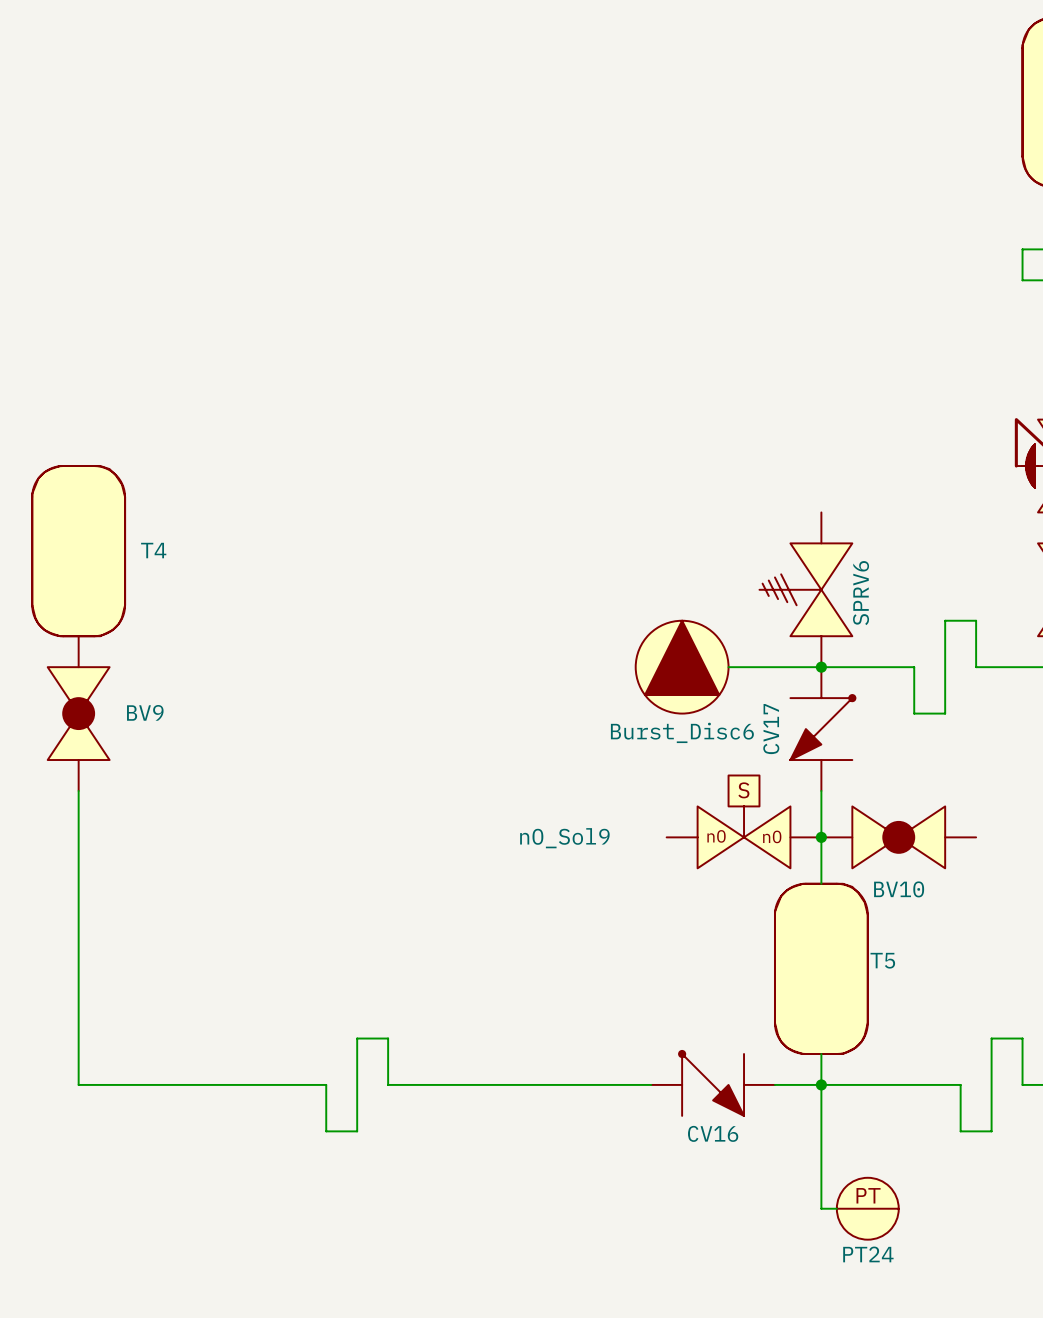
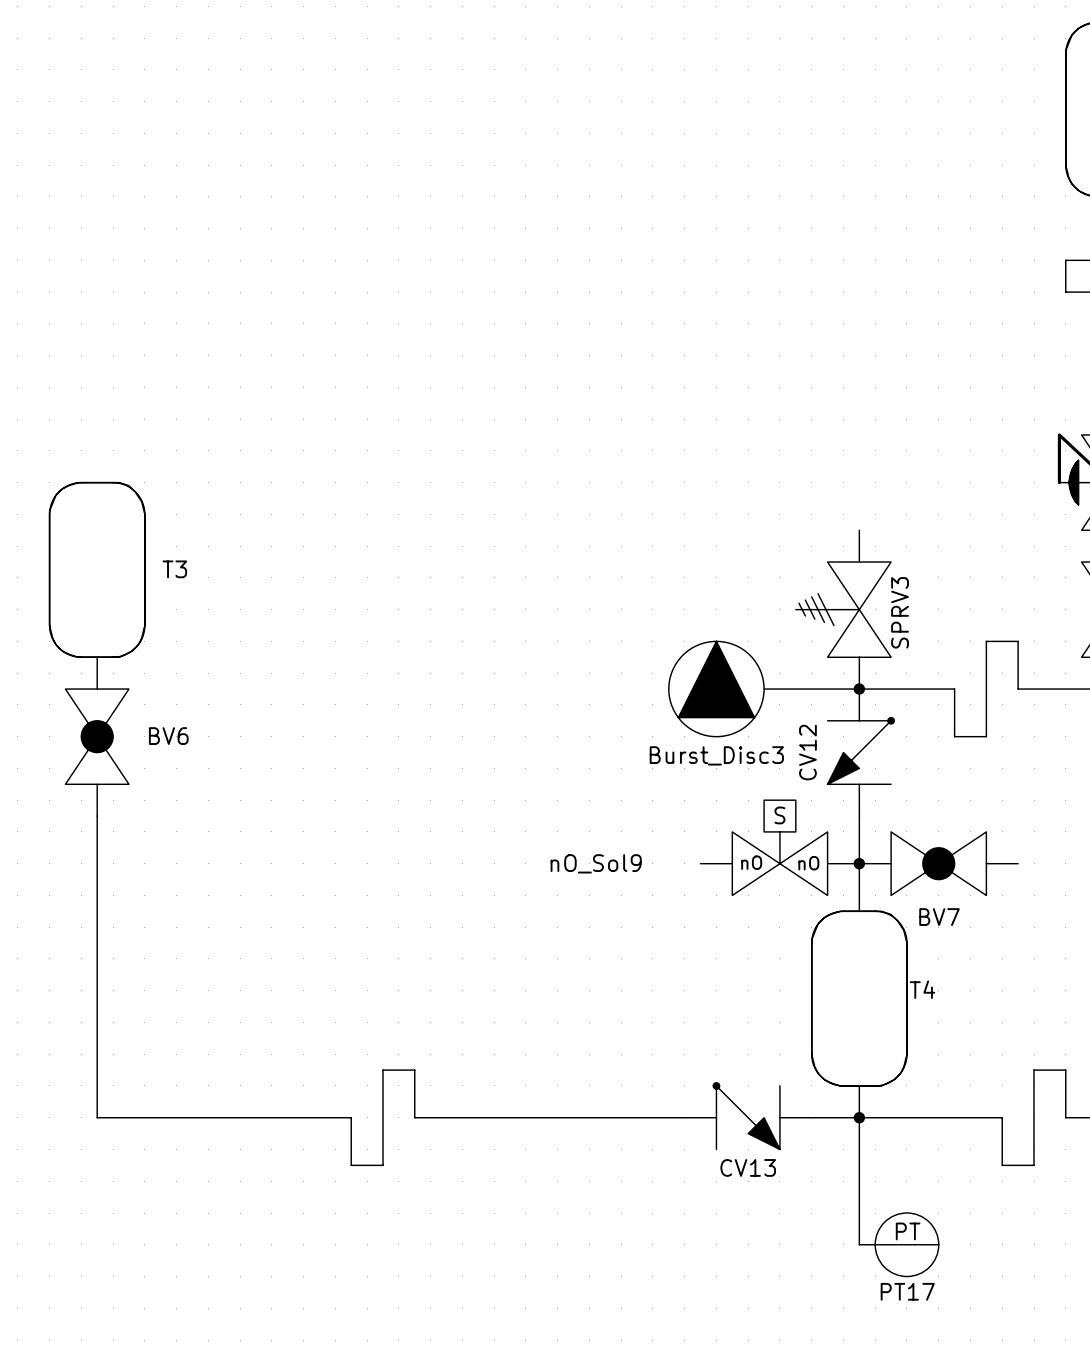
T4 name: T4 (153, 550) -> T3 (174, 569)
SPRV6 name: SPRV6 (861, 593) -> SPRV3 (900, 612)
BV9 name: BV9 (145, 712) -> BV6 (168, 736)
CV17 name: CV17 (771, 729) -> CV12 (807, 752)
Burst_Disc6 name: Burst_Disc6 (682, 732) -> Burst_Disc3 (716, 755)
BV10 name: BV10 (899, 889) -> BV7 (939, 917)
T5 name: T5 (882, 960) -> T4 (922, 989)
CV16 name: CV16 (713, 1133) -> CV13 (748, 1167)
PT24 name: PT24 (868, 1254) -> PT17 (907, 1291)

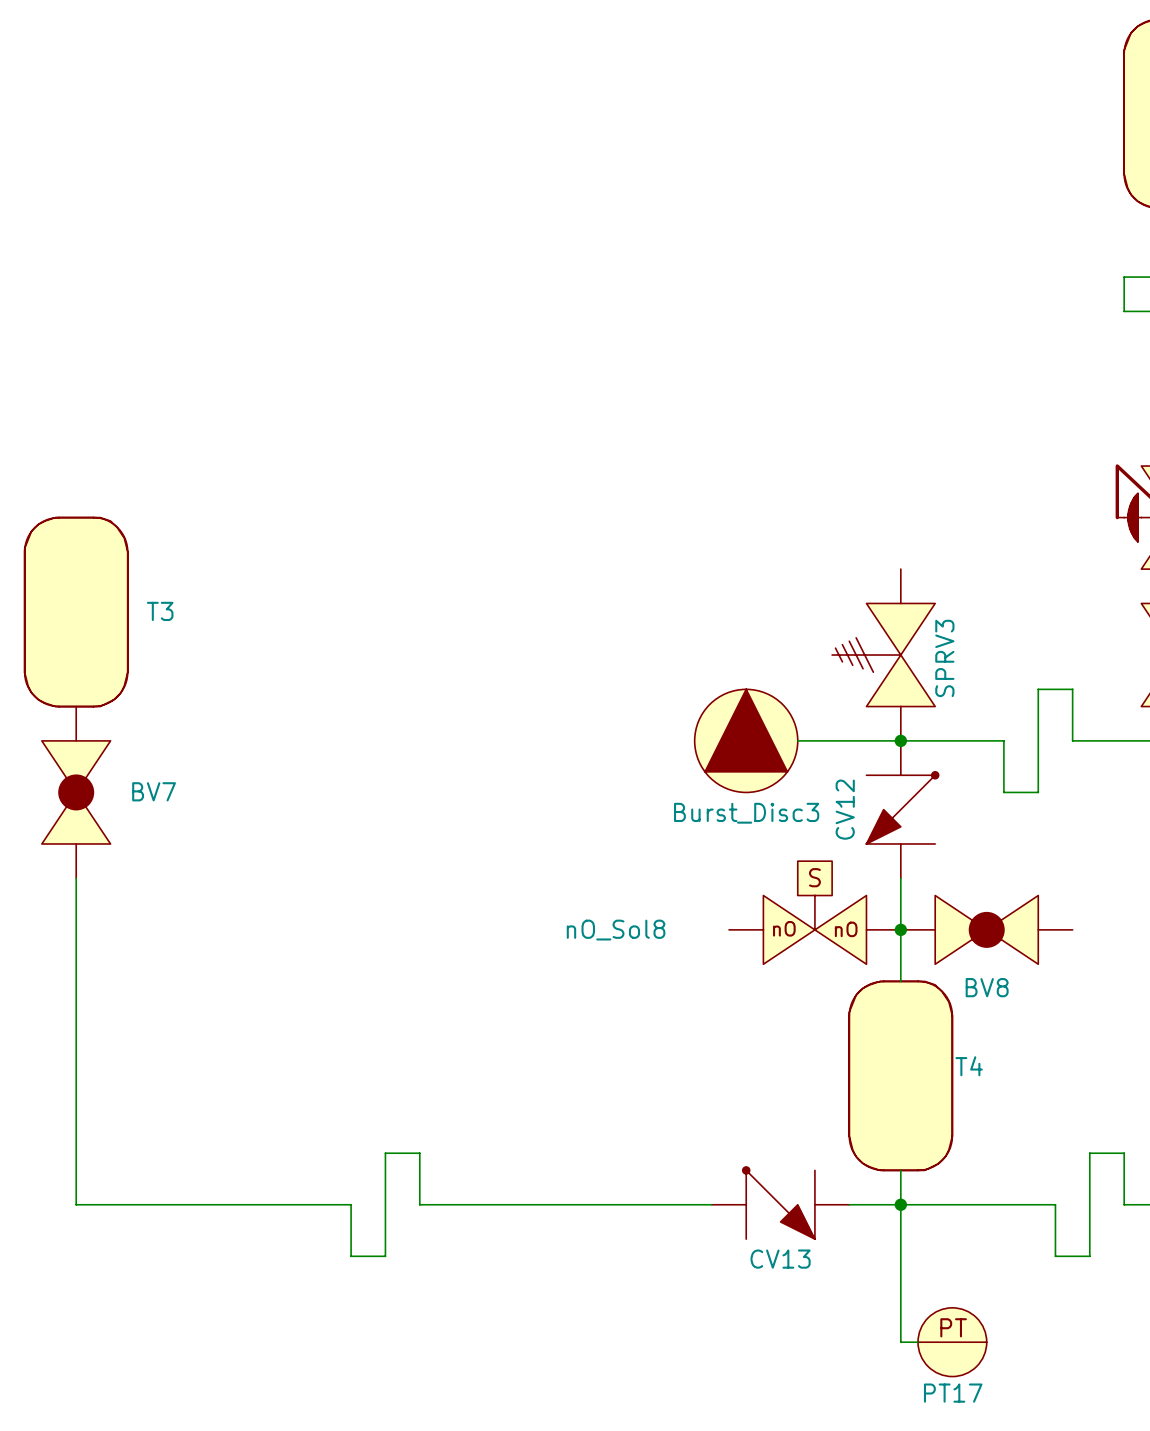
BV6 name: BV6 (168, 736) -> BV7 (154, 791)
nO_Sol9 name: nO_Sol9 (596, 863) -> nO_Sol8 (616, 930)
BV7 name: BV7 (939, 917) -> BV8 (987, 987)

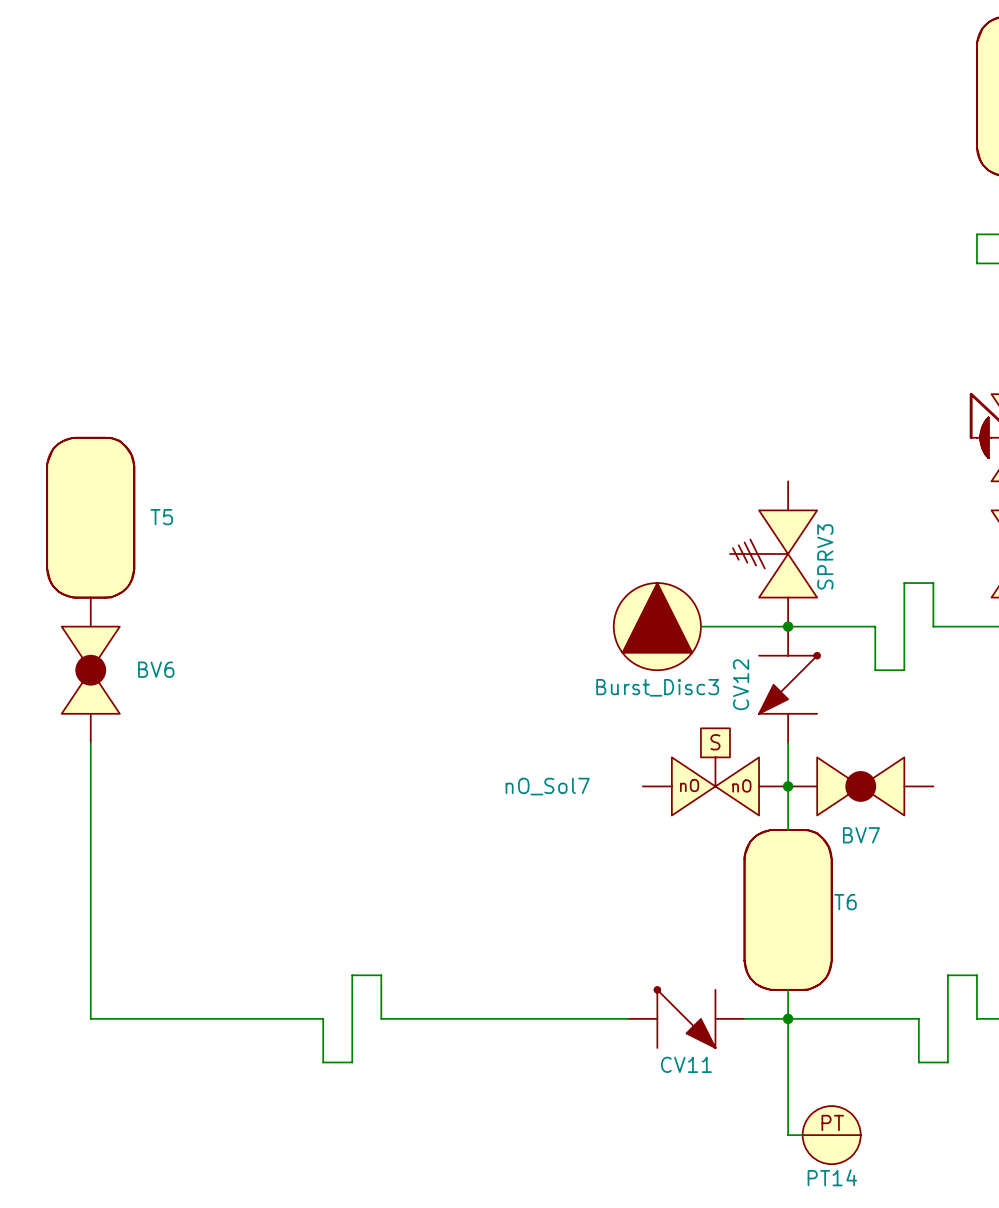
T3 name: T3 (160, 611) -> T5 (161, 517)
BV7 name: BV7 (154, 791) -> BV6 (156, 669)
nO_Sol8 name: nO_Sol8 (616, 930) -> nO_Sol7 (547, 786)
BV8 name: BV8 (987, 987) -> BV7 (861, 835)
T4 name: T4 (969, 1066) -> T6 (845, 902)
CV13 name: CV13 (780, 1259) -> CV11 (686, 1064)
PT17 name: PT17 (953, 1393) -> PT14 (832, 1177)

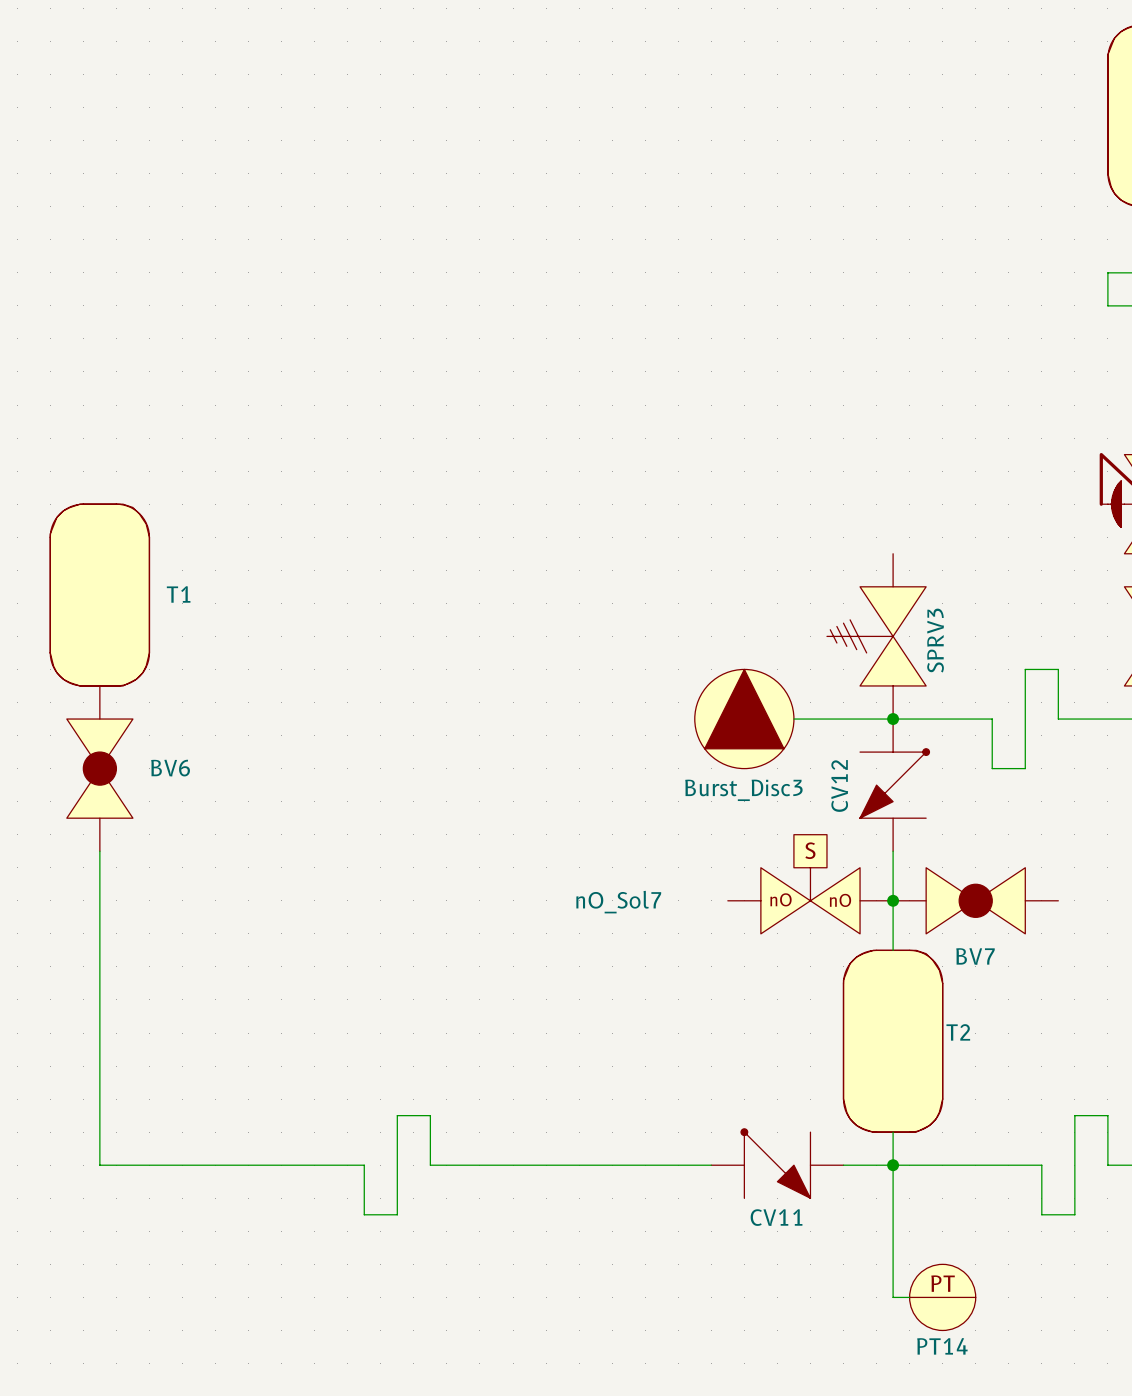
T5 name: T5 (161, 517) -> T1 (178, 594)
T6 name: T6 (845, 902) -> T2 (958, 1032)

